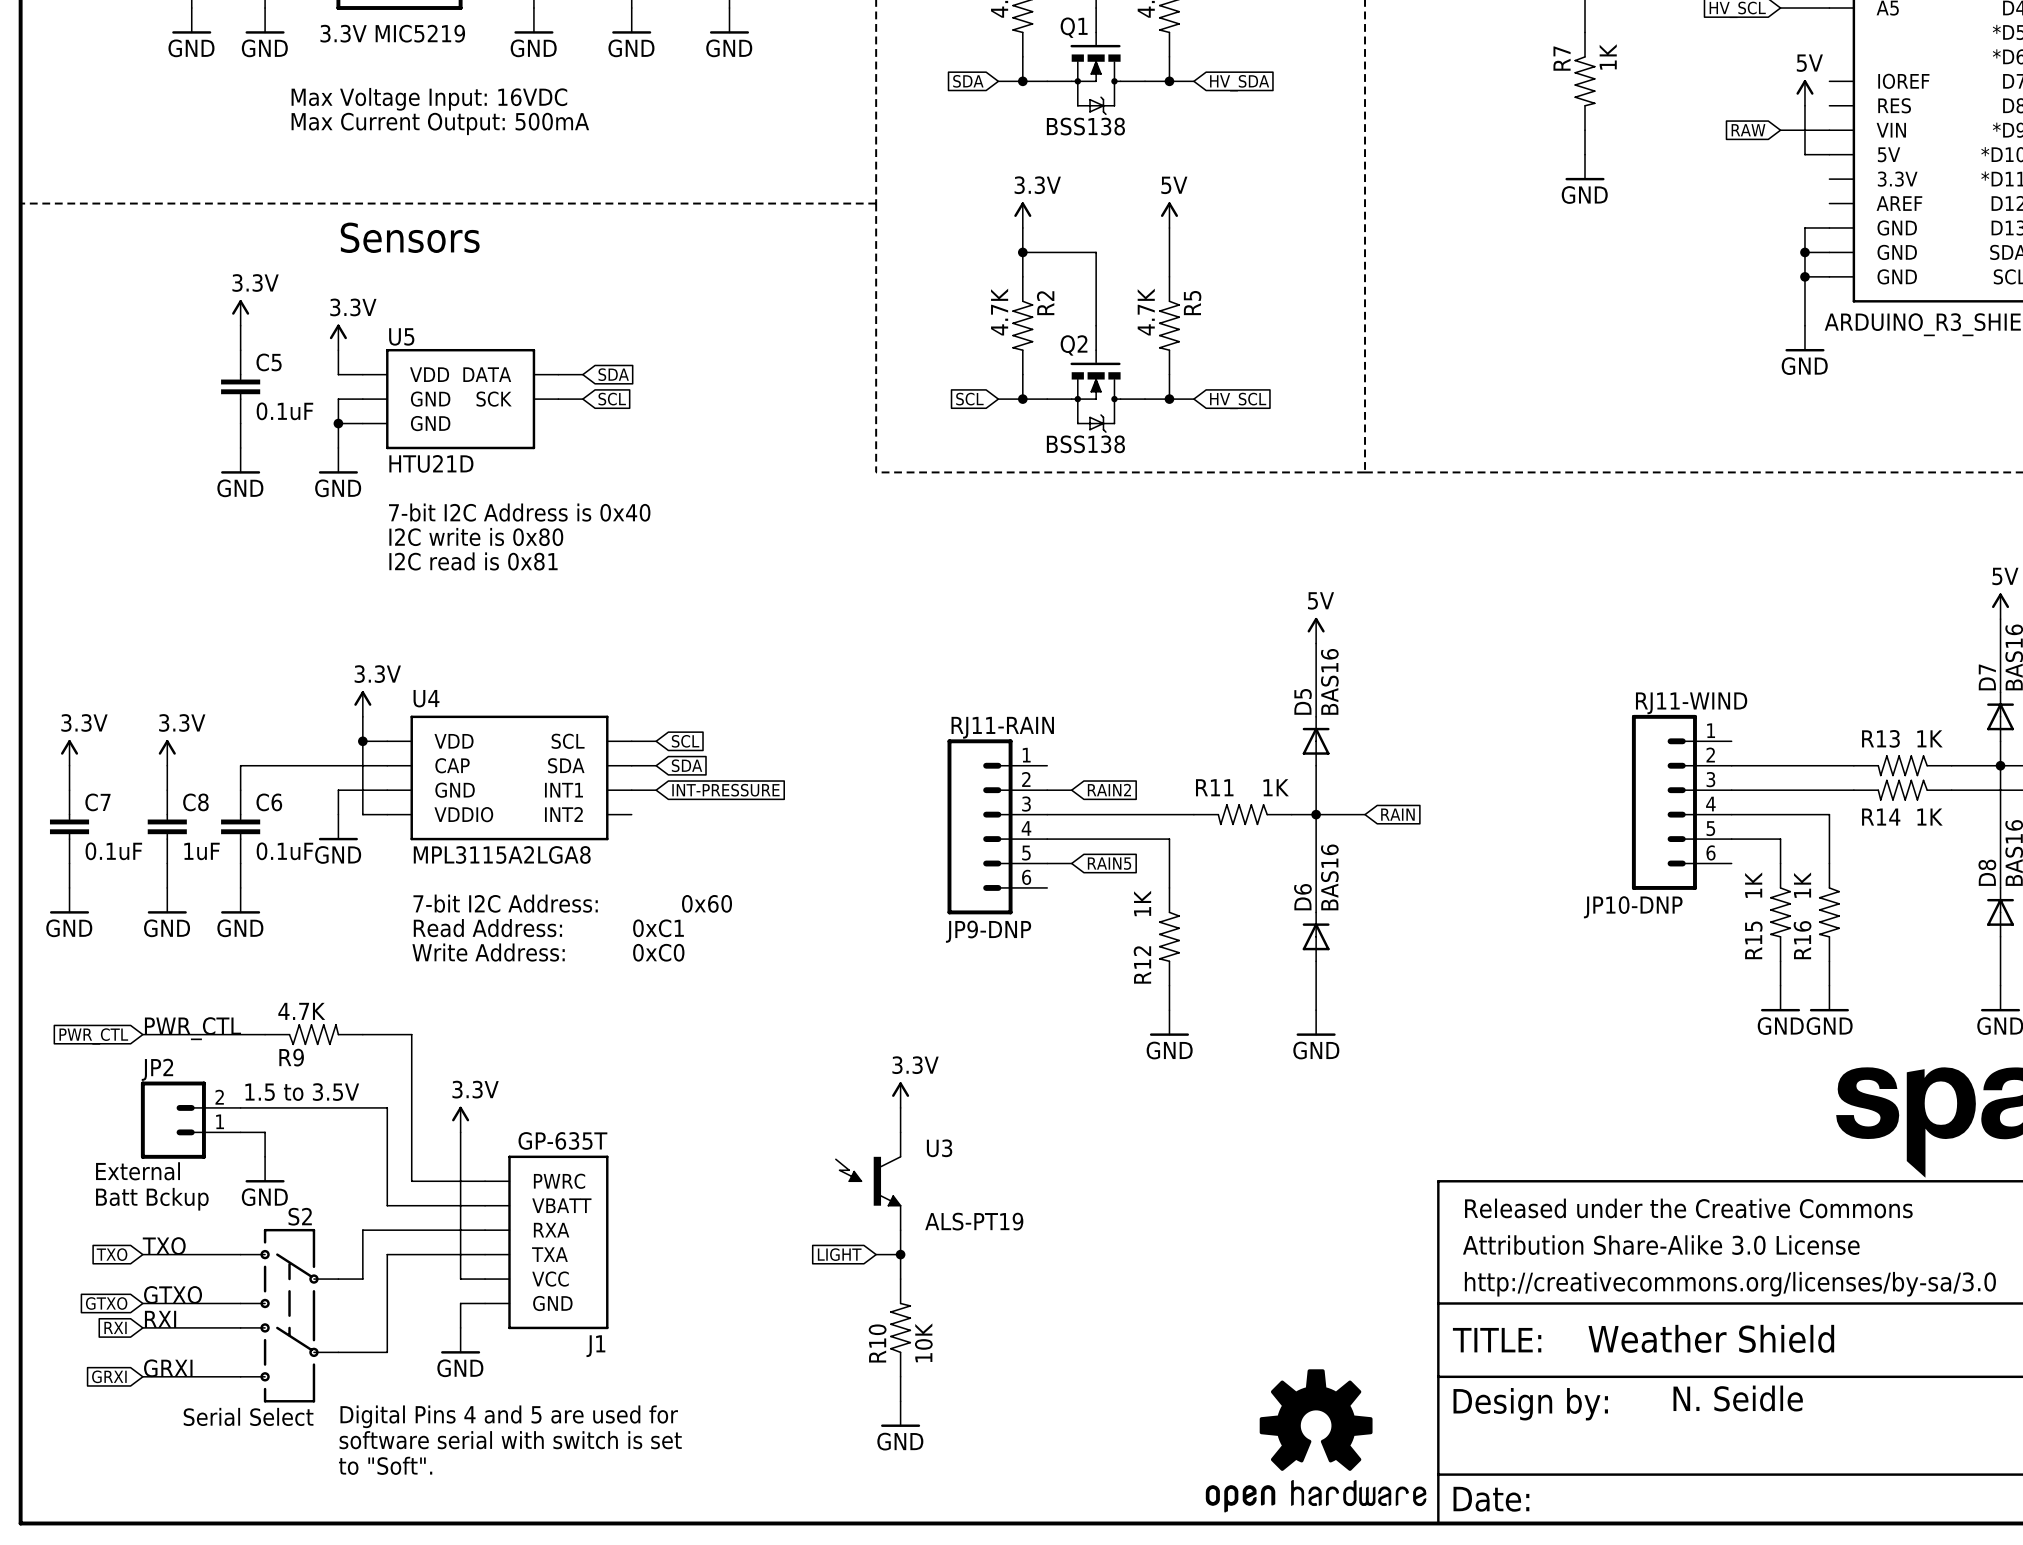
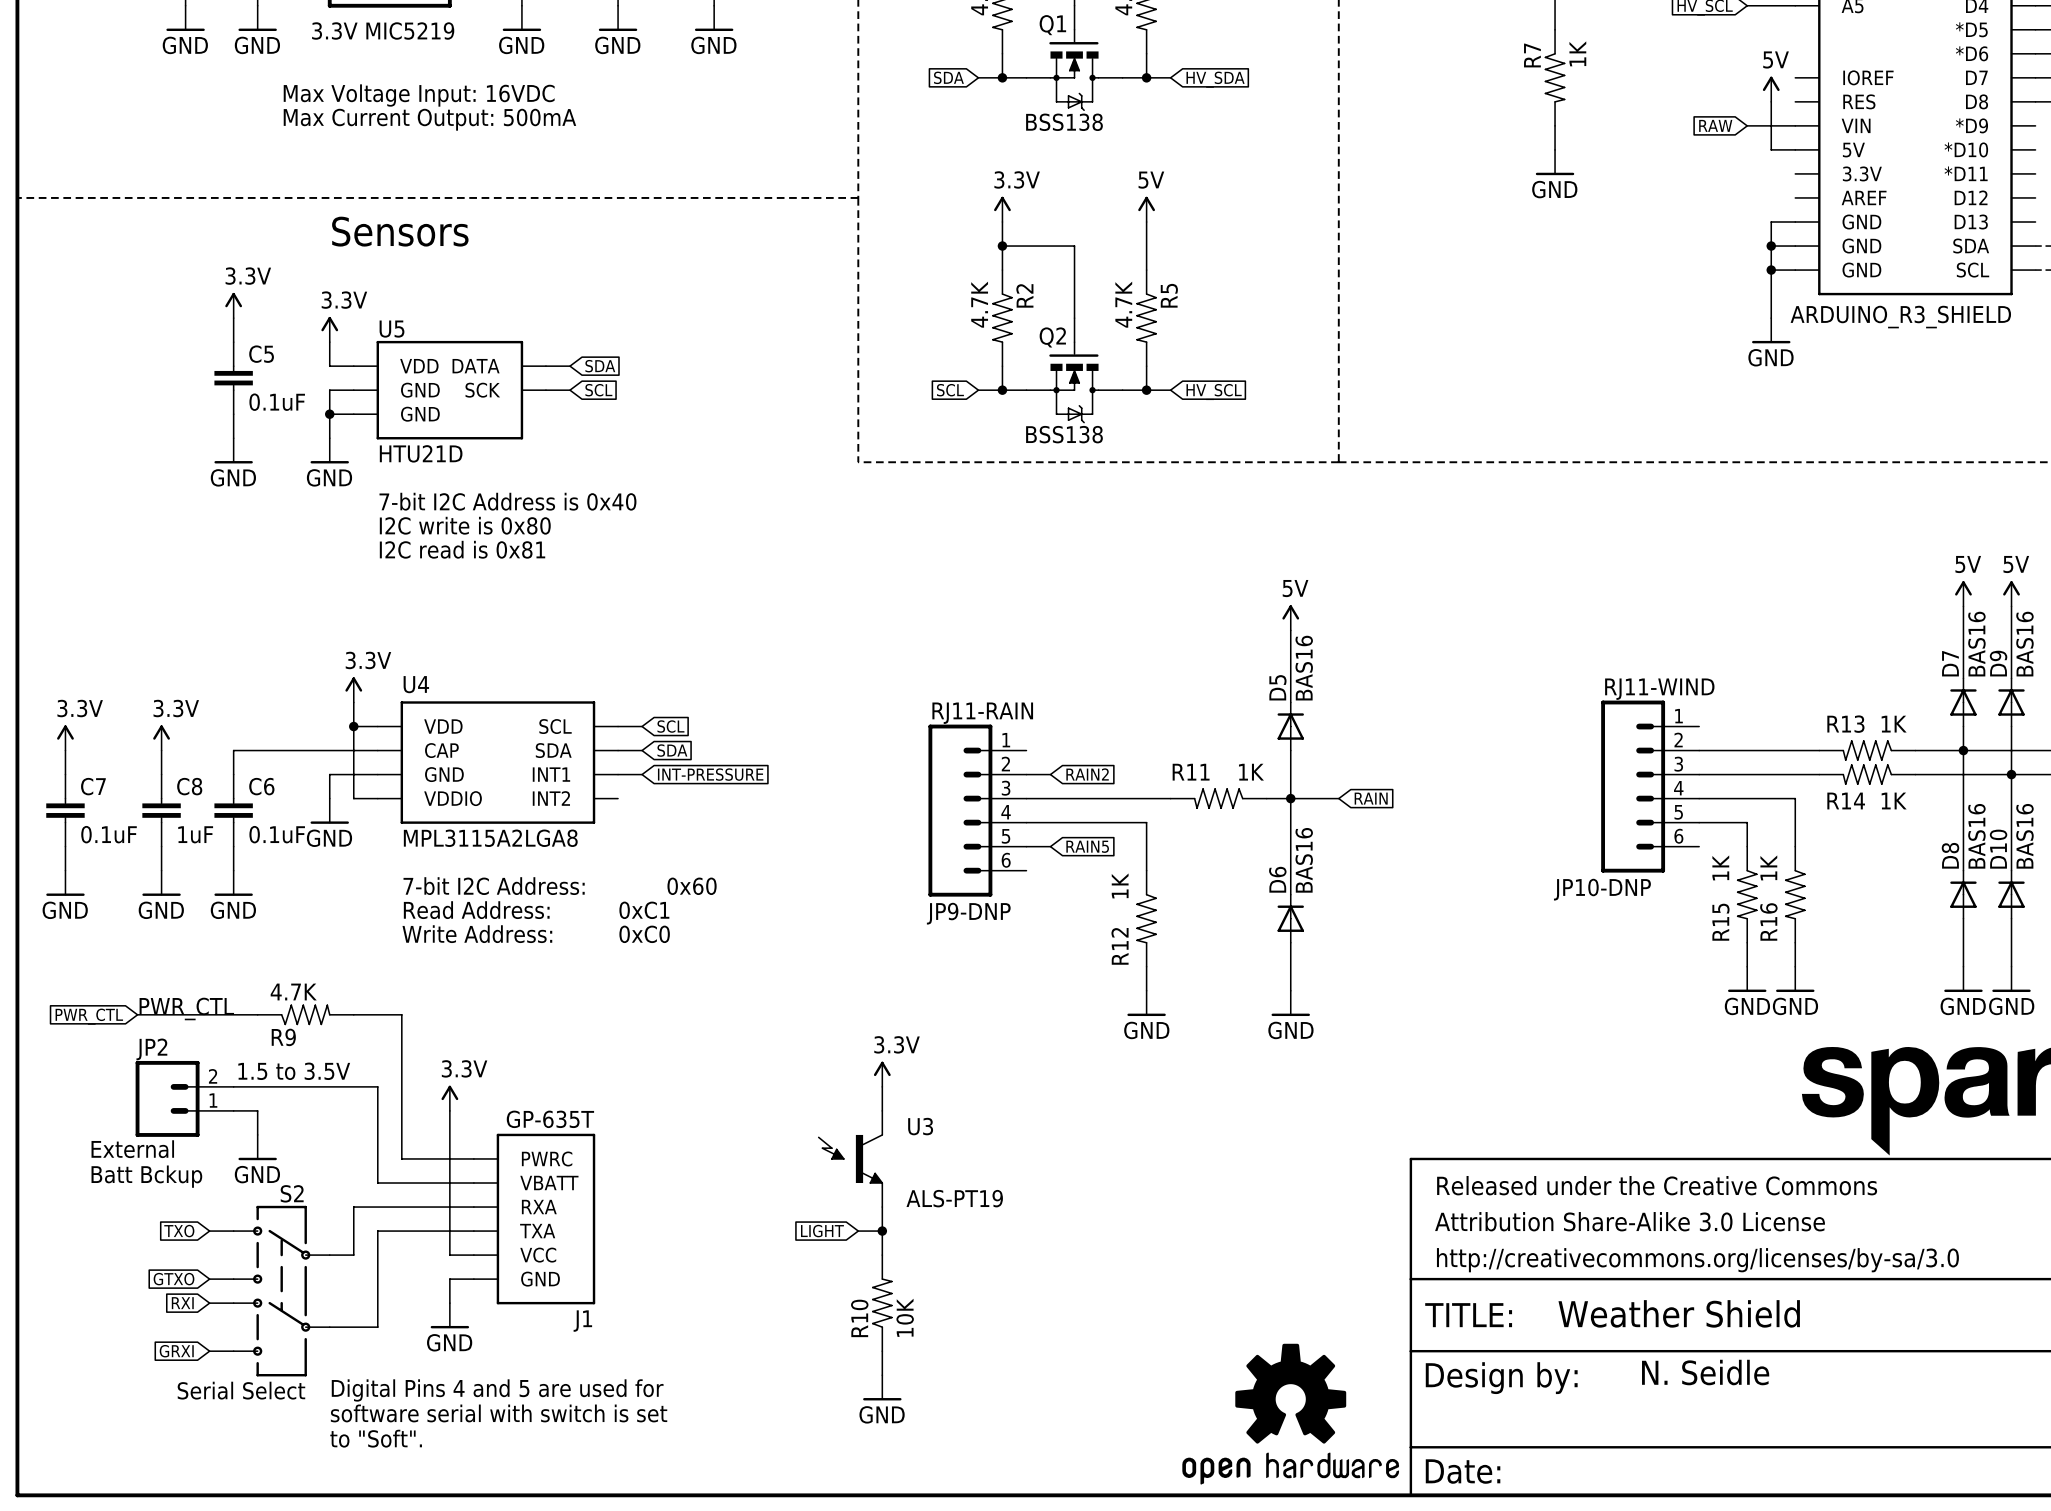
label: TXO (164, 1246) -> none
global label position: TXO (112, 1254) -> TXO (179, 1231)
wire: (142, 1254) (216, 1254) -> none
label: GTXO (173, 1294) -> none
global label position: GTXO (106, 1303) -> GTXO (174, 1279)
wire: (142, 1303) (216, 1303) -> none
label: RXI (160, 1319) -> none
global label position: RXI (115, 1327) -> RXI (182, 1303)
wire: (142, 1327) (216, 1327) -> none
label: GRXI (168, 1368) -> none
global label position: GRXI (109, 1376) -> GRXI (176, 1351)
wire: (142, 1376) (216, 1376) -> none

